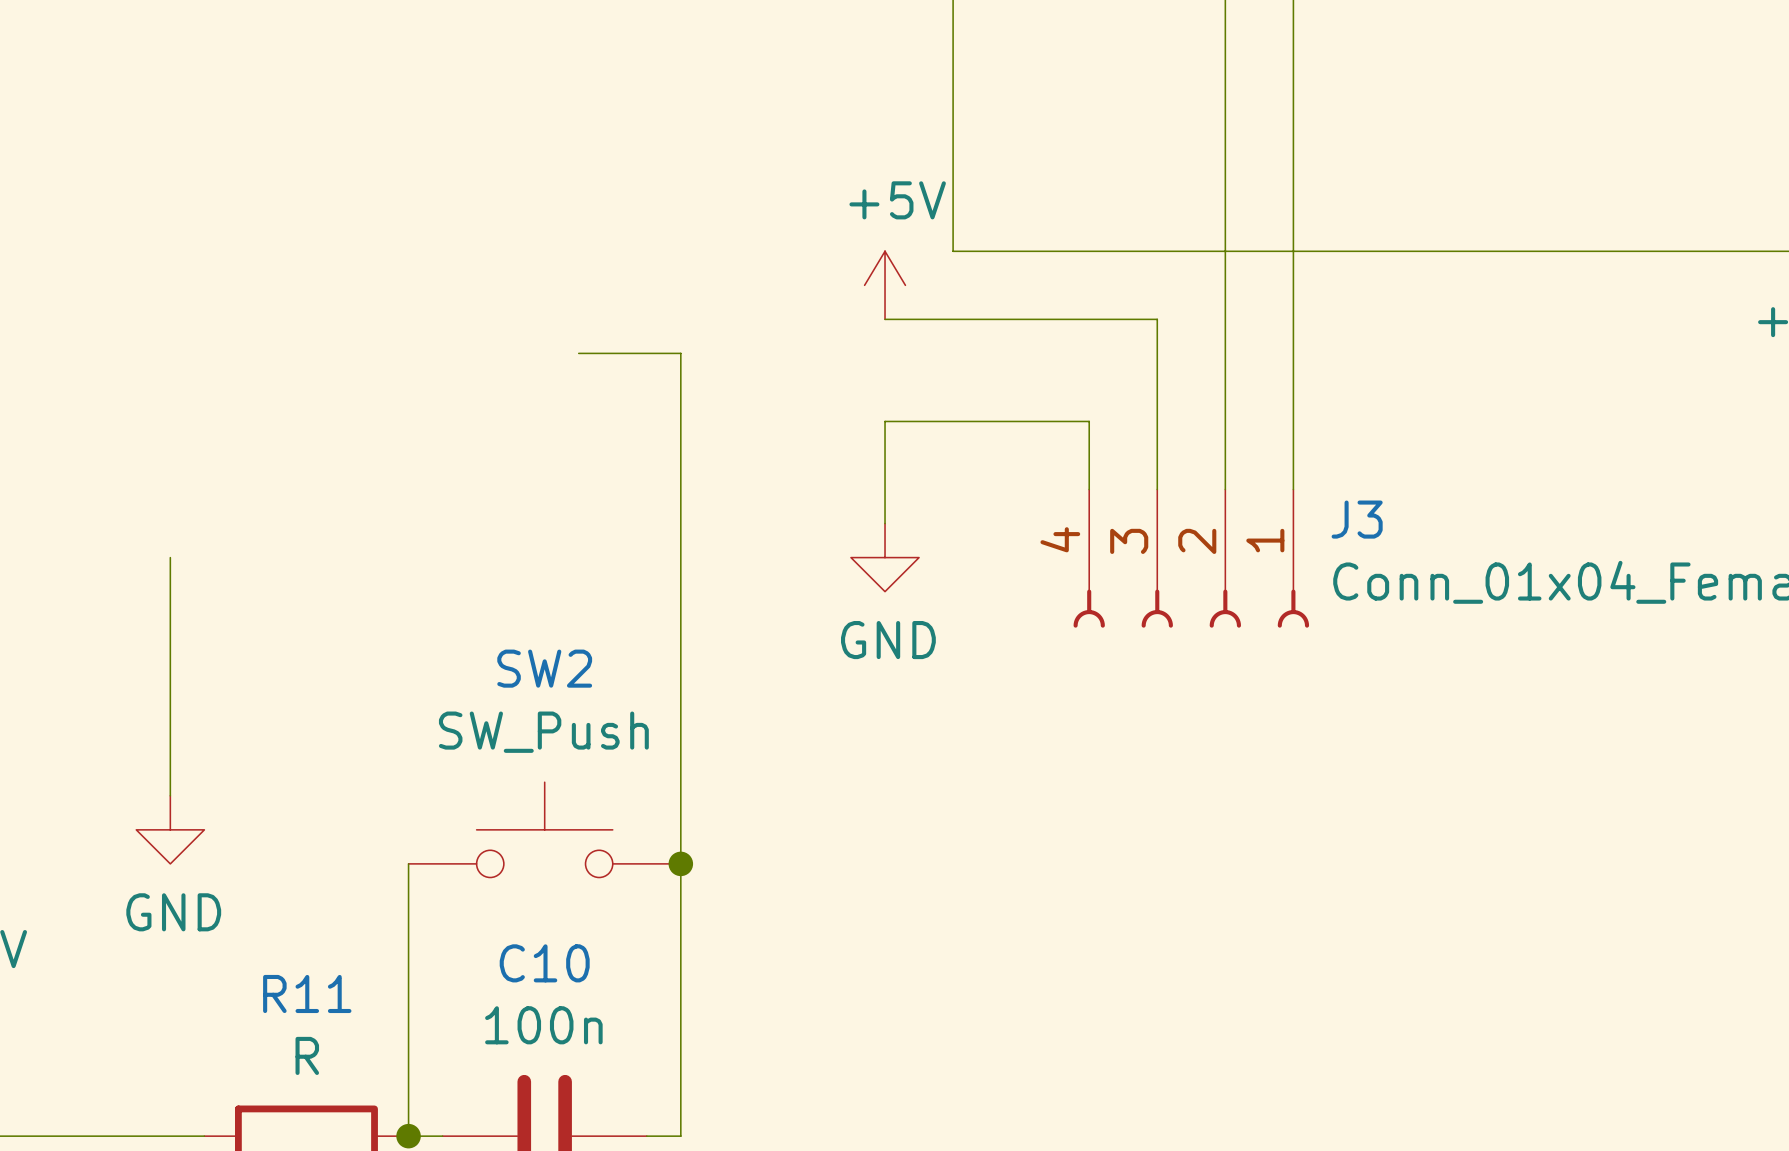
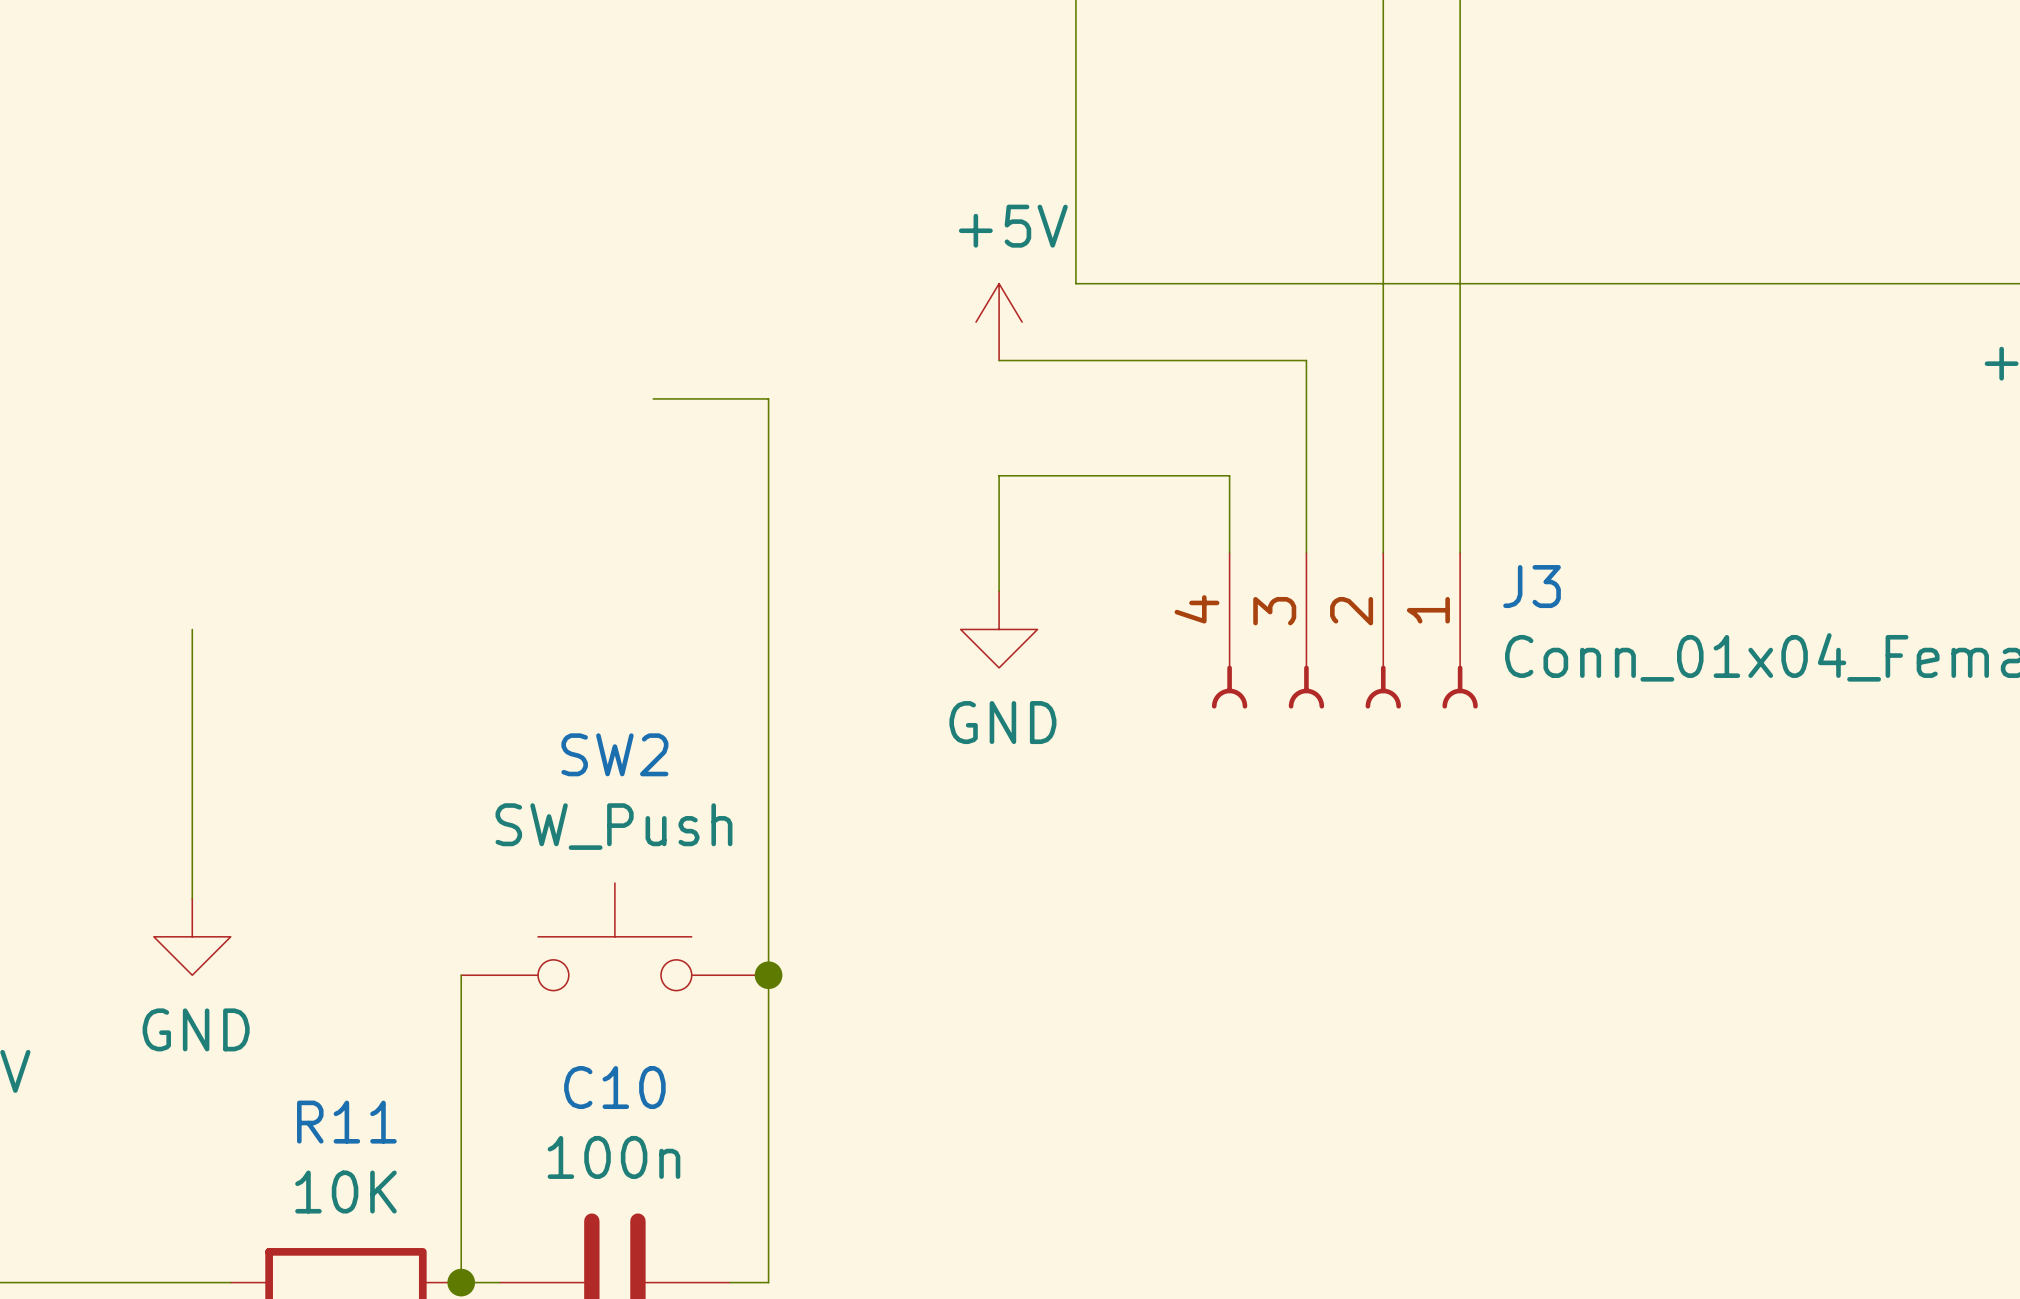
R11 value: R (307, 1055) -> 10K (345, 1192)

